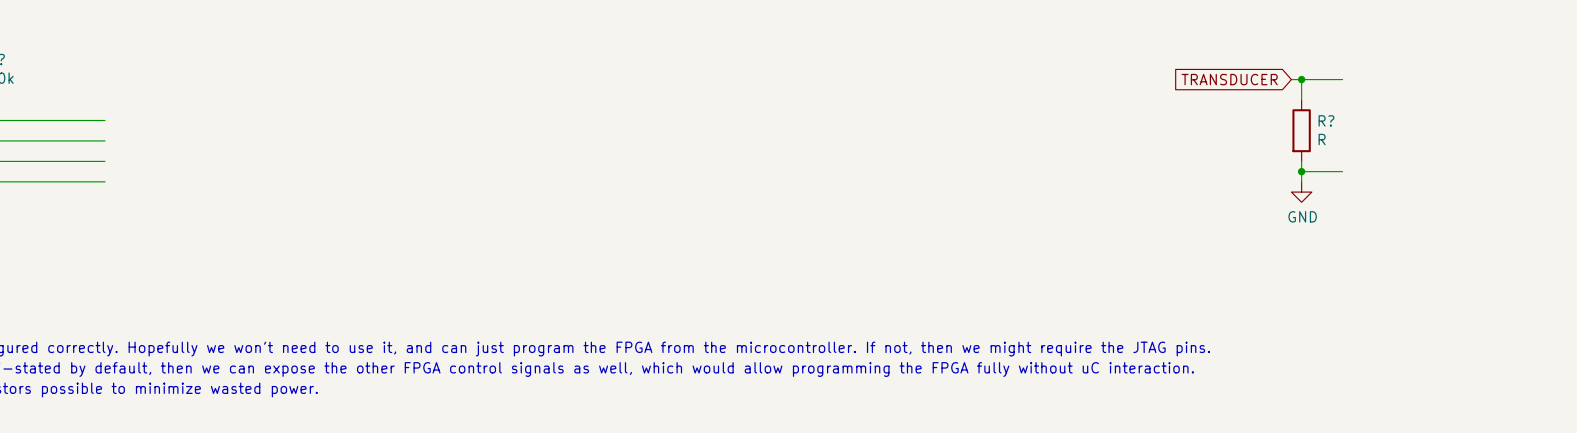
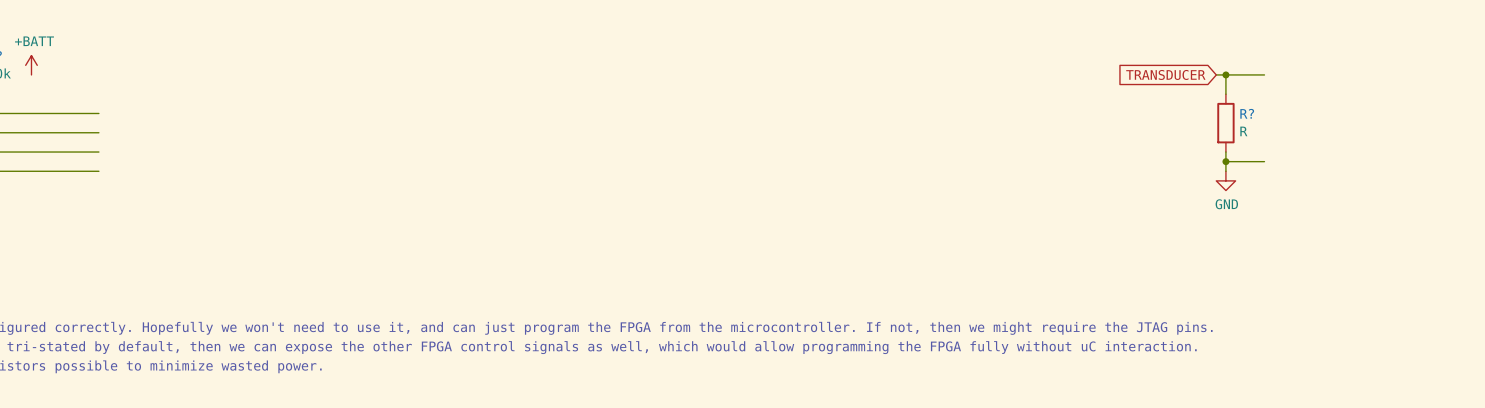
power symbol: none -> +BATT (31, 65)

